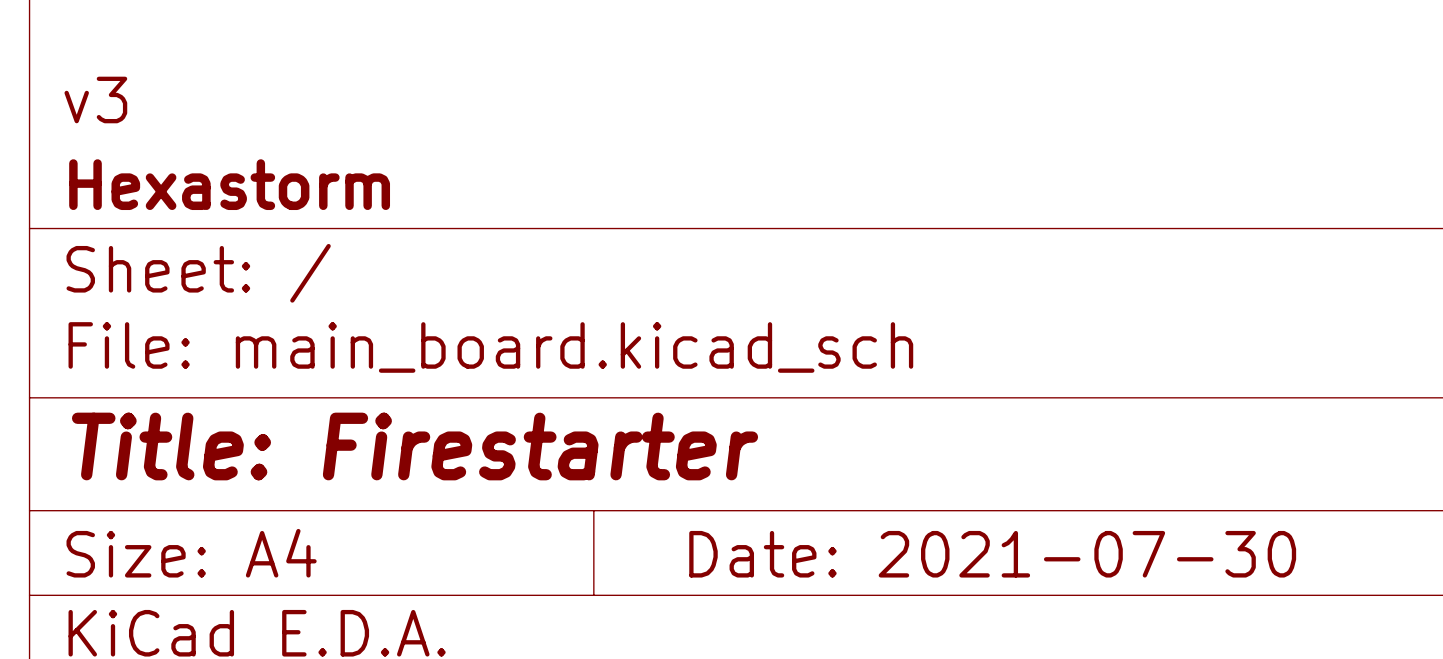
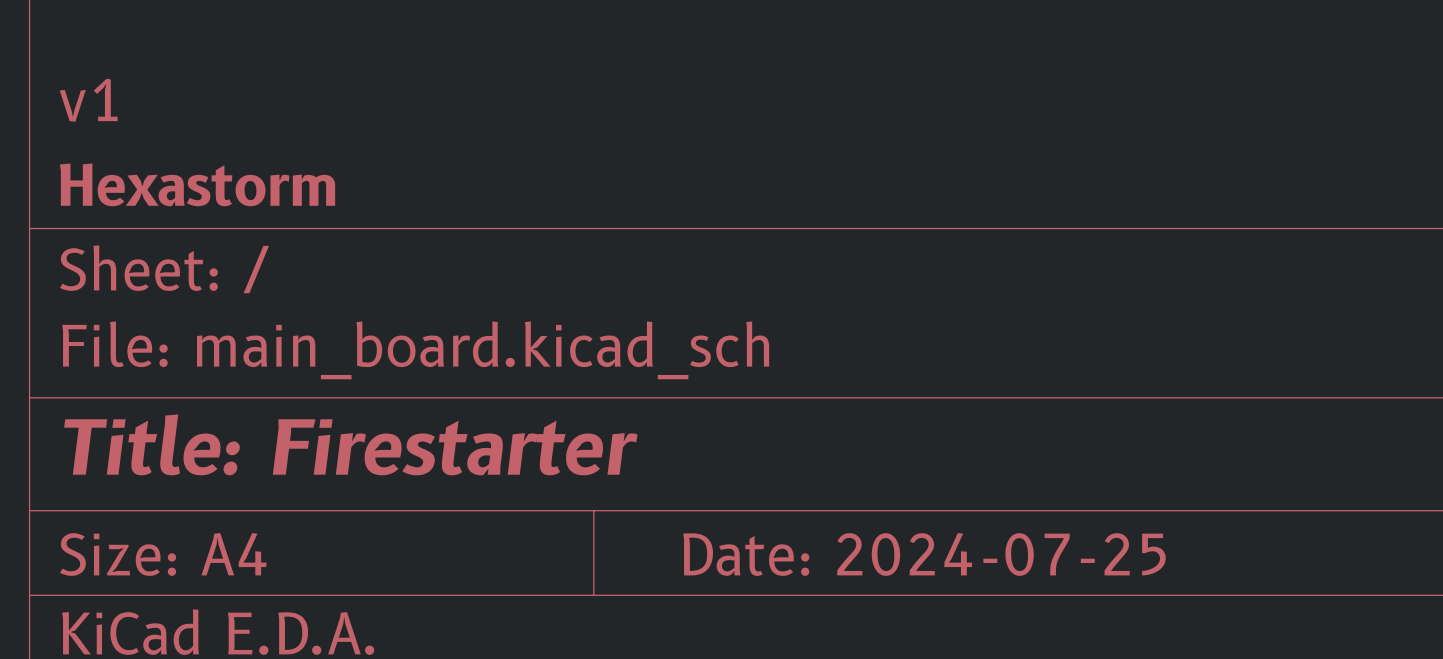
title block: v3 (95, 99) -> v1 (88, 100)
title block: Date: 2021-07-30 (992, 554) -> Date: 2024-07-25 (924, 554)

